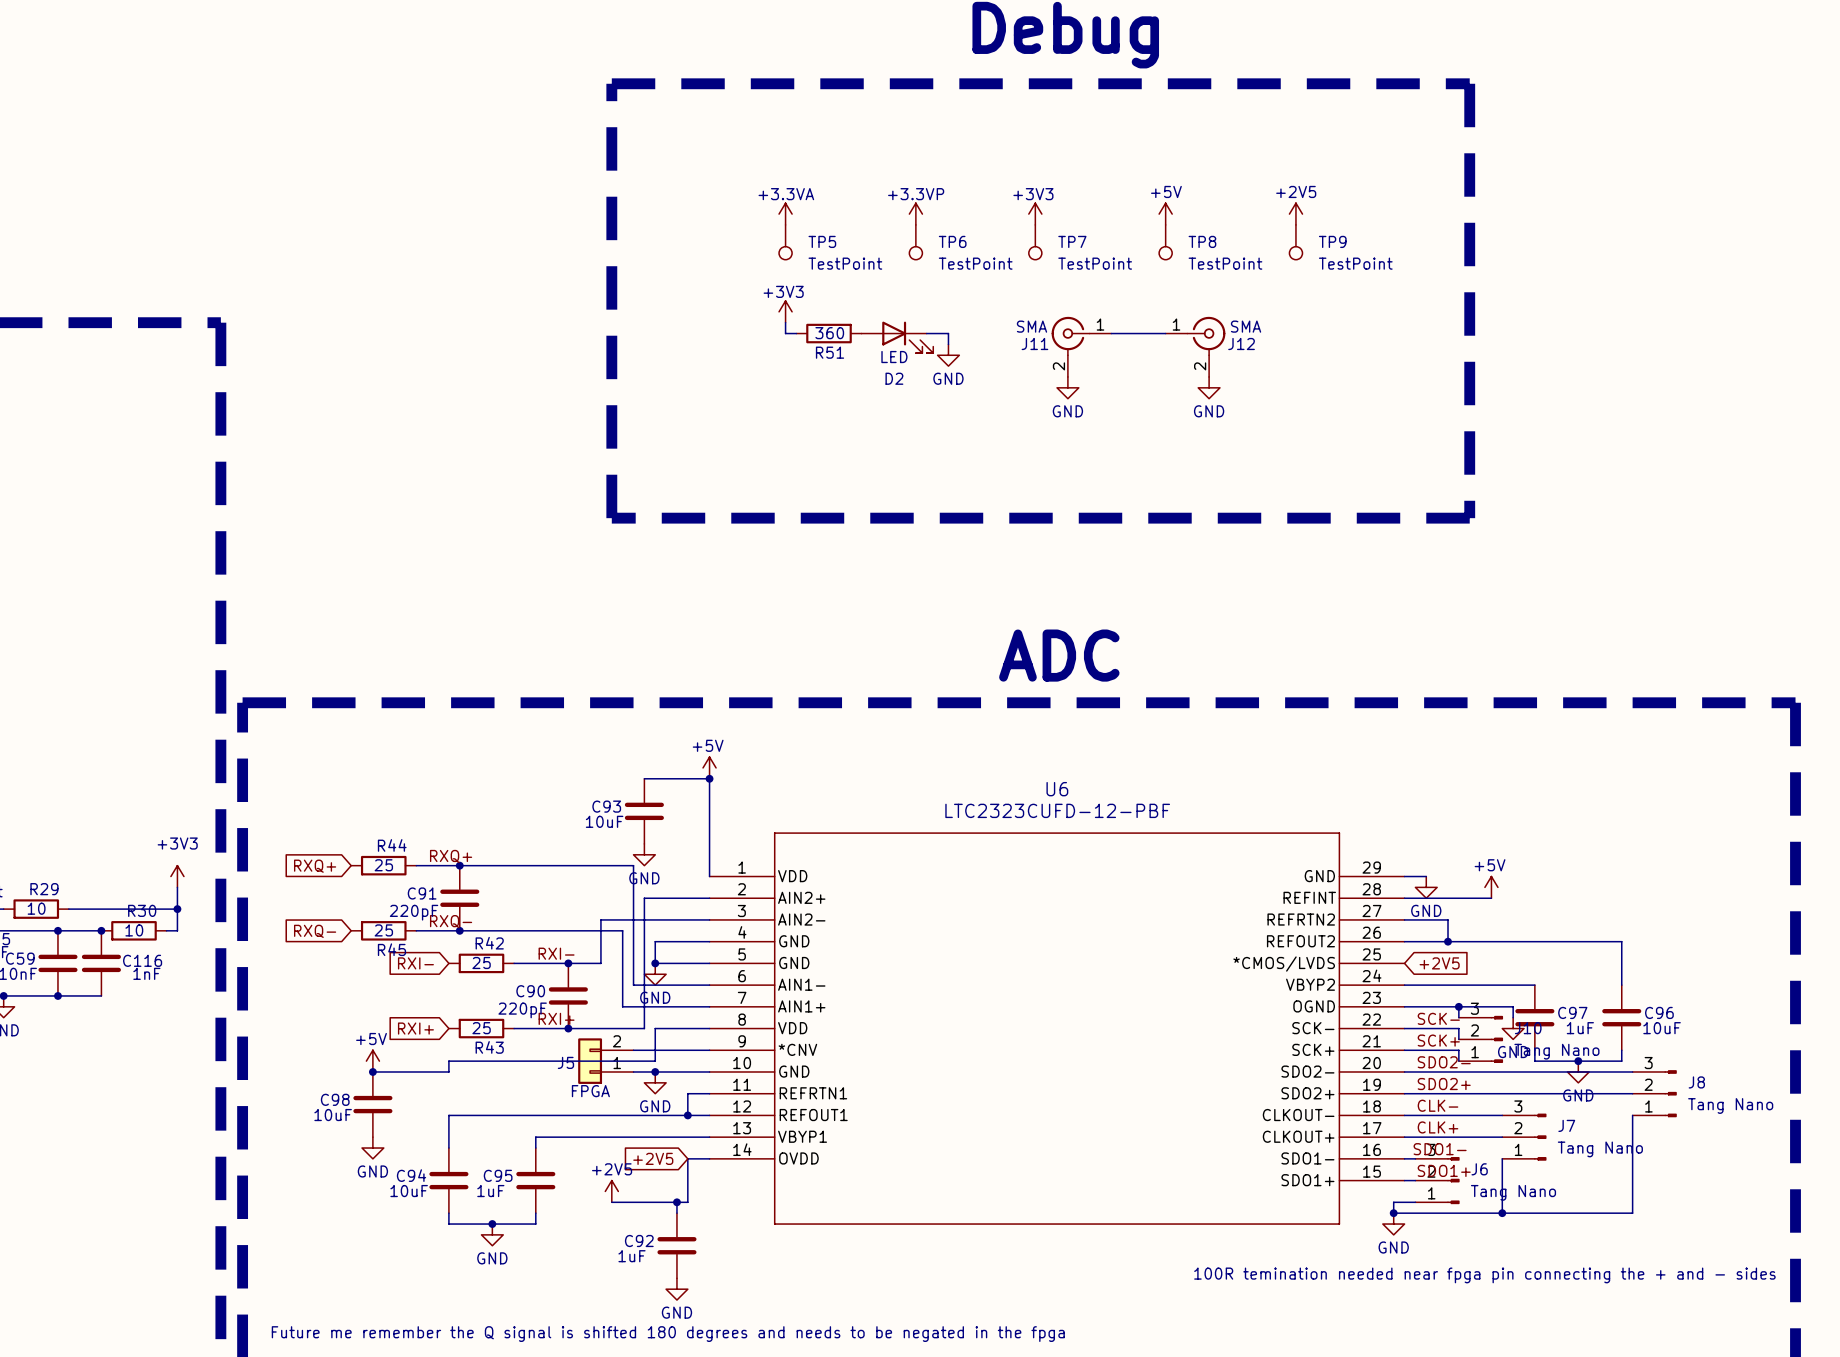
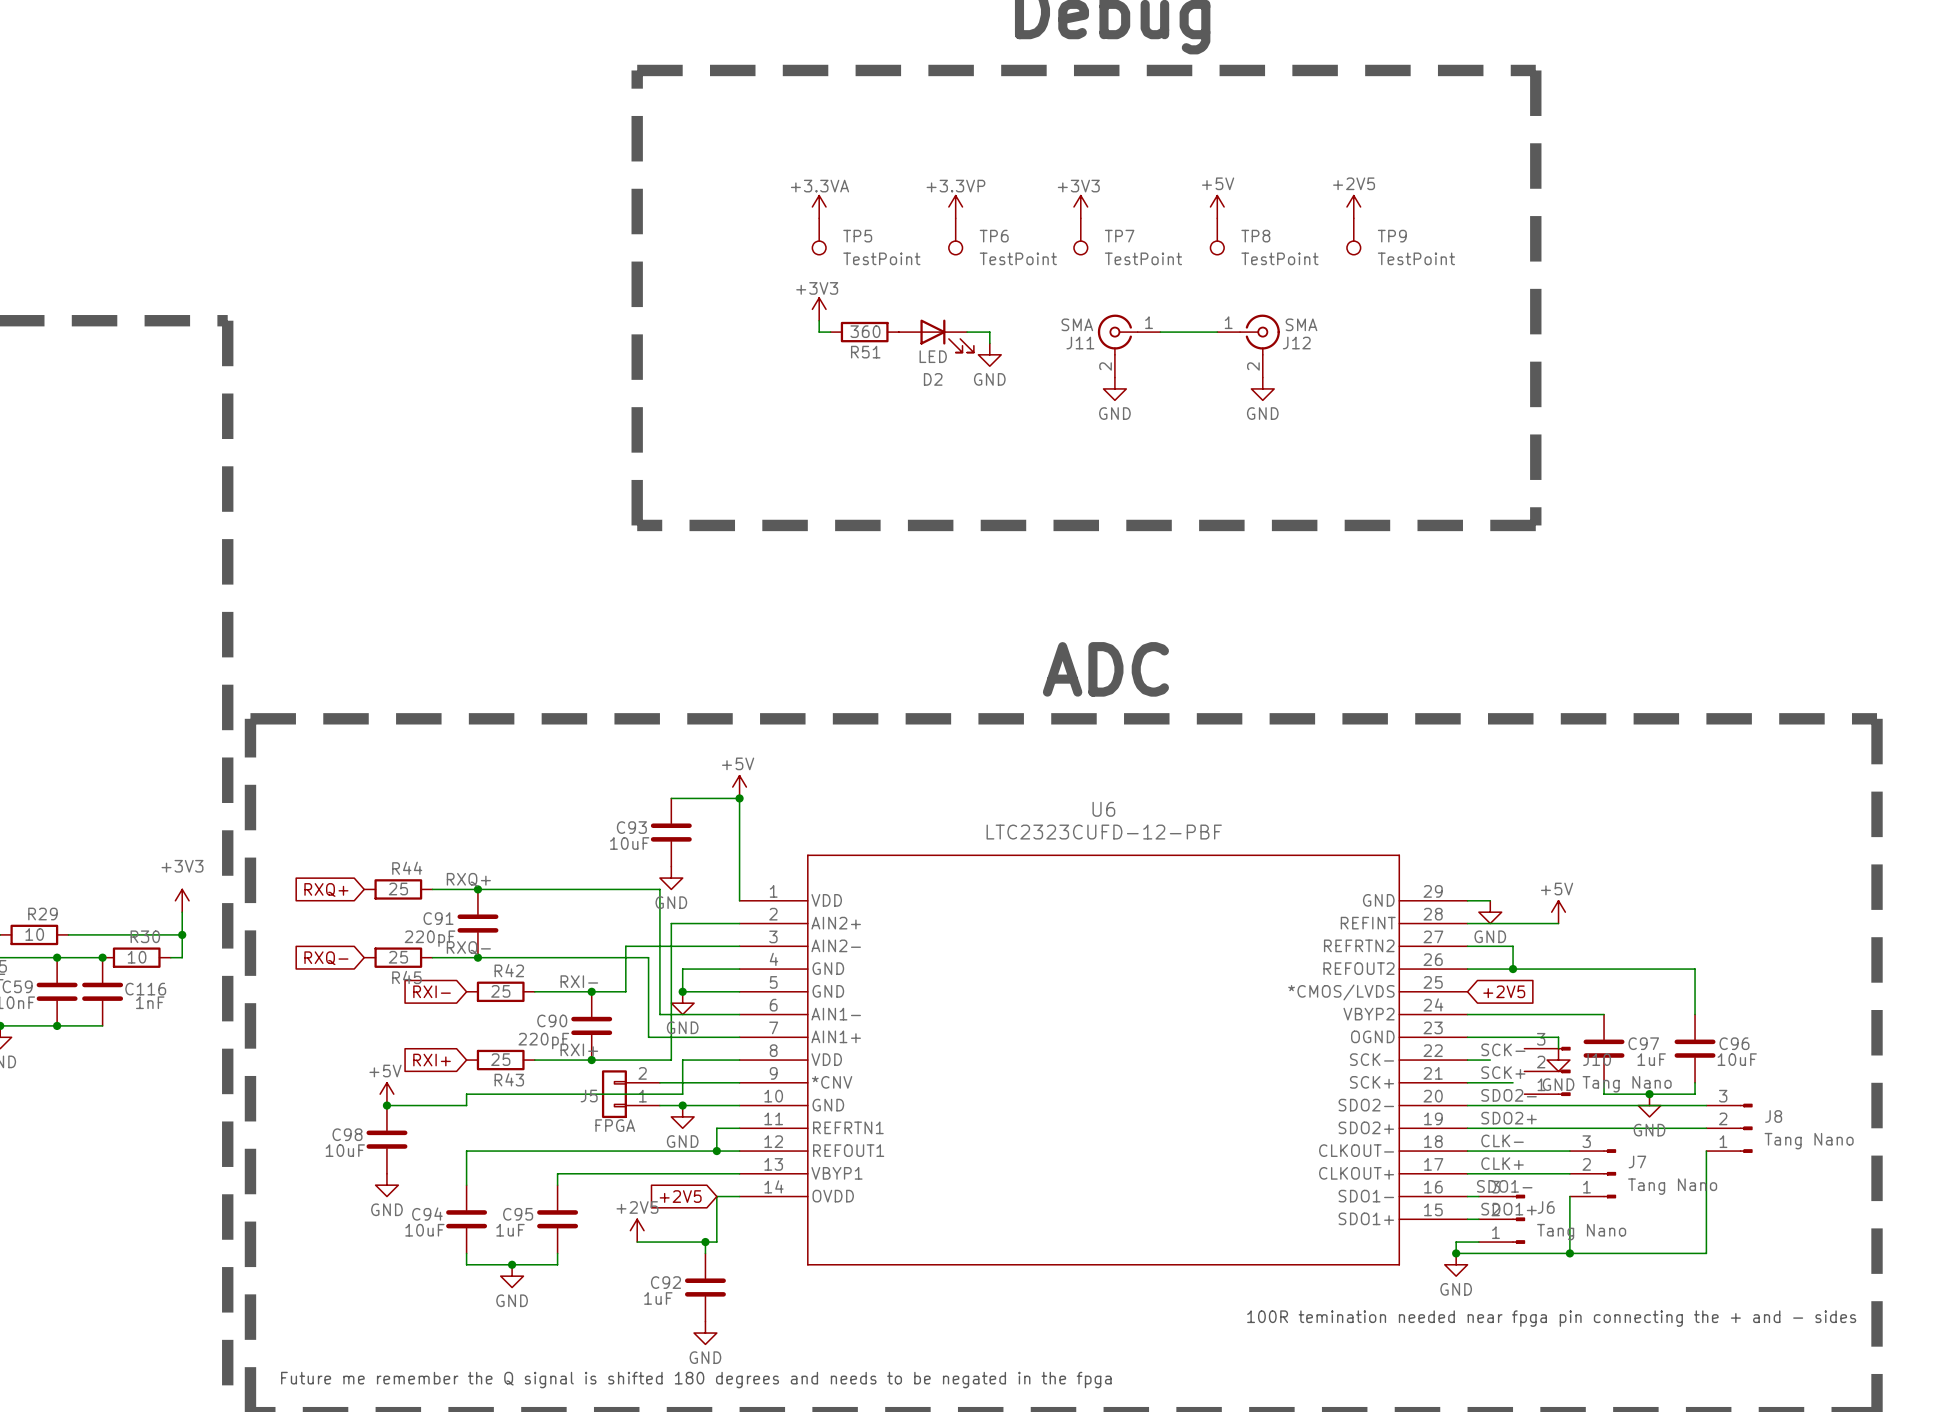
wire: (1458, 1006) (1458, 1017) -> none
junction: (1458, 1006) -> none
wire: (1491, 1006) (1513, 1006) (1513, 1017) -> (1558, 1037) (1558, 1048)
wire: (1426, 1028) (1458, 1028) (1458, 1039) -> none
power symbol position: GND (1513, 1028) -> GND (1558, 1060)
wire: (1448, 1050) (1458, 1050) (1458, 1061) -> none

